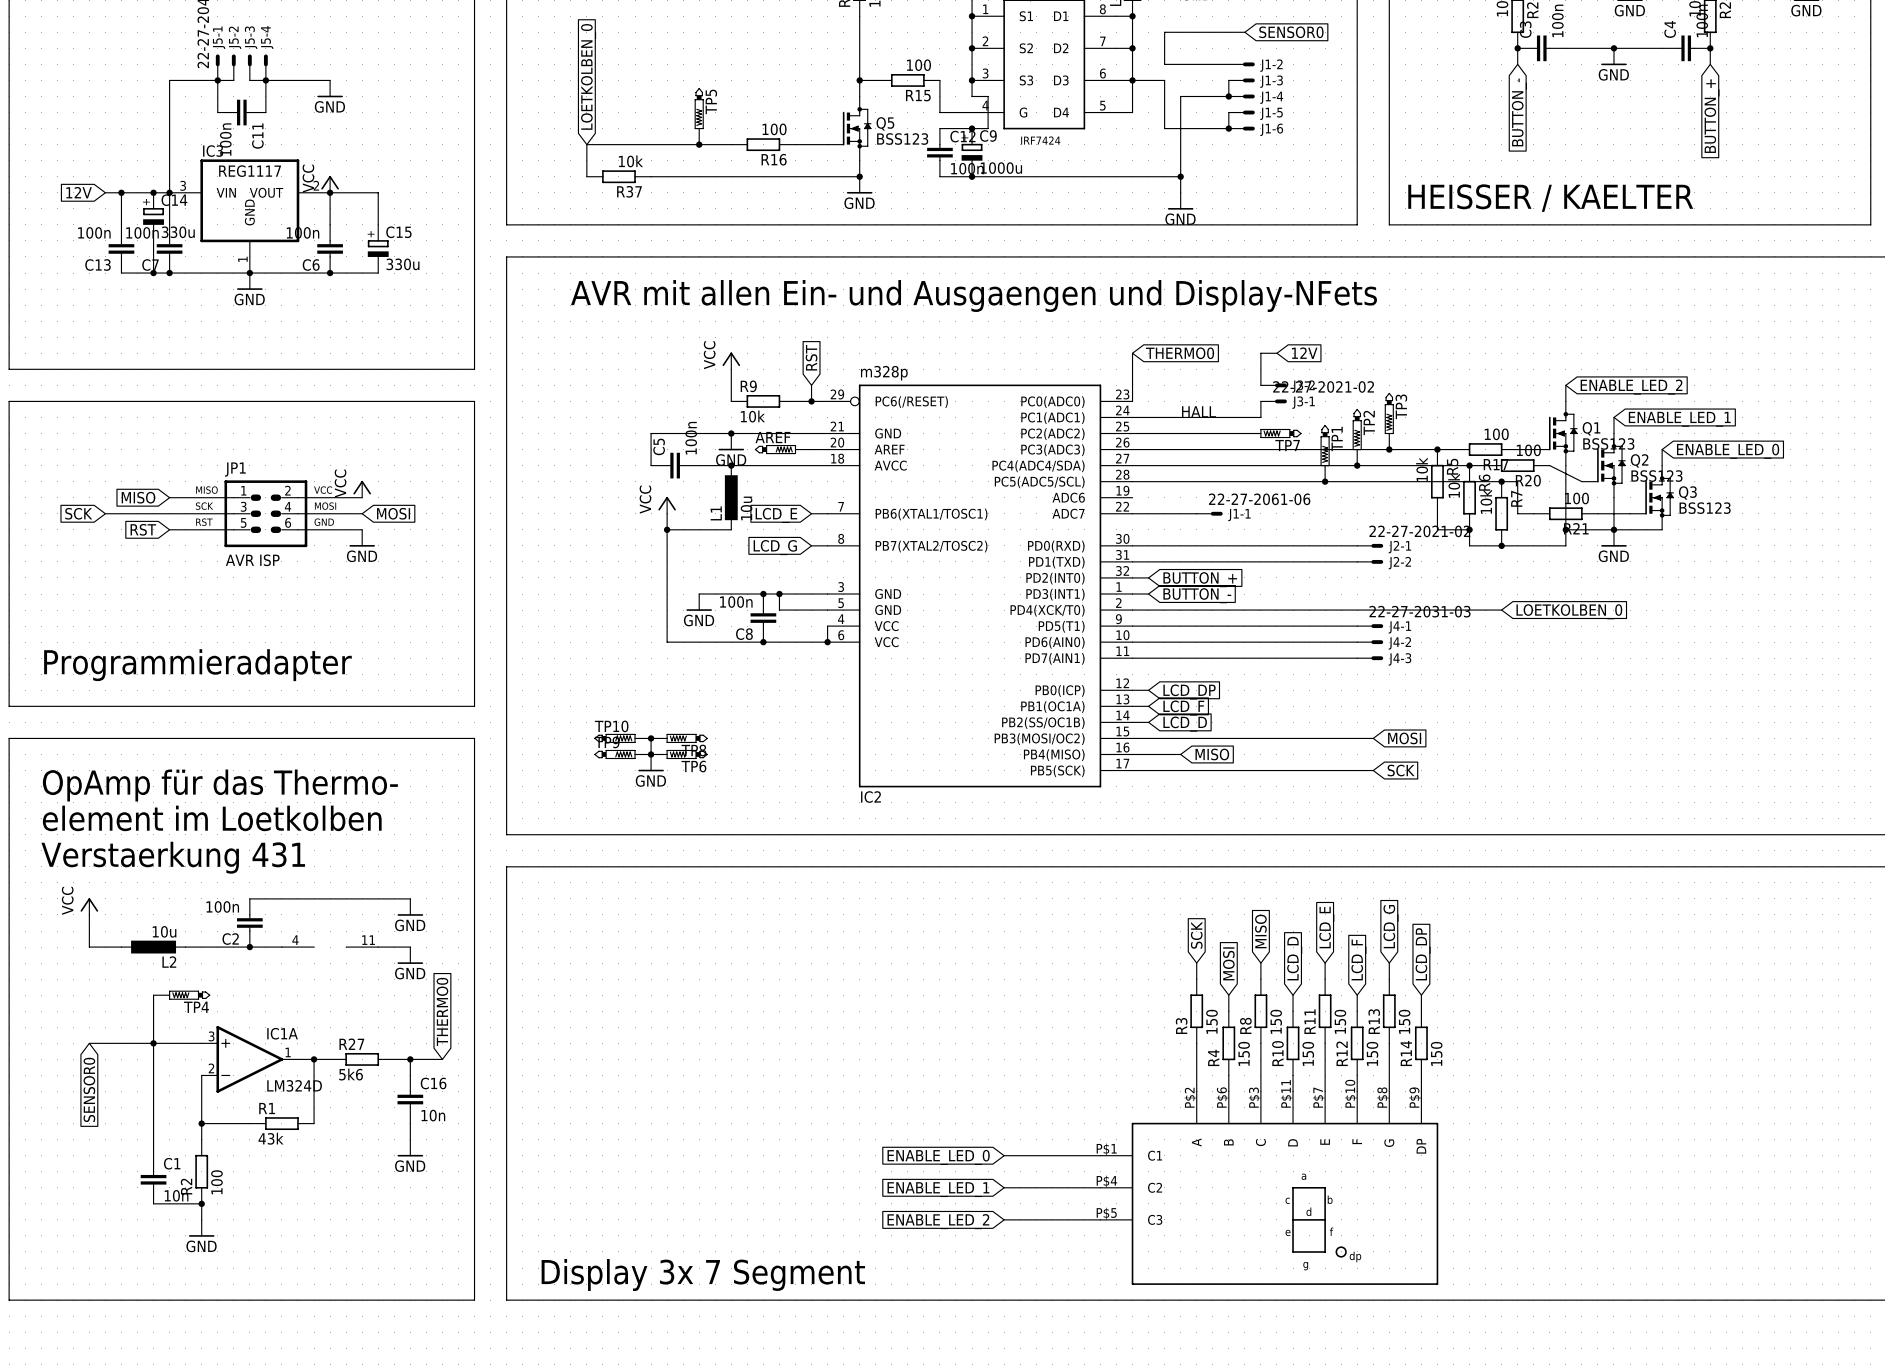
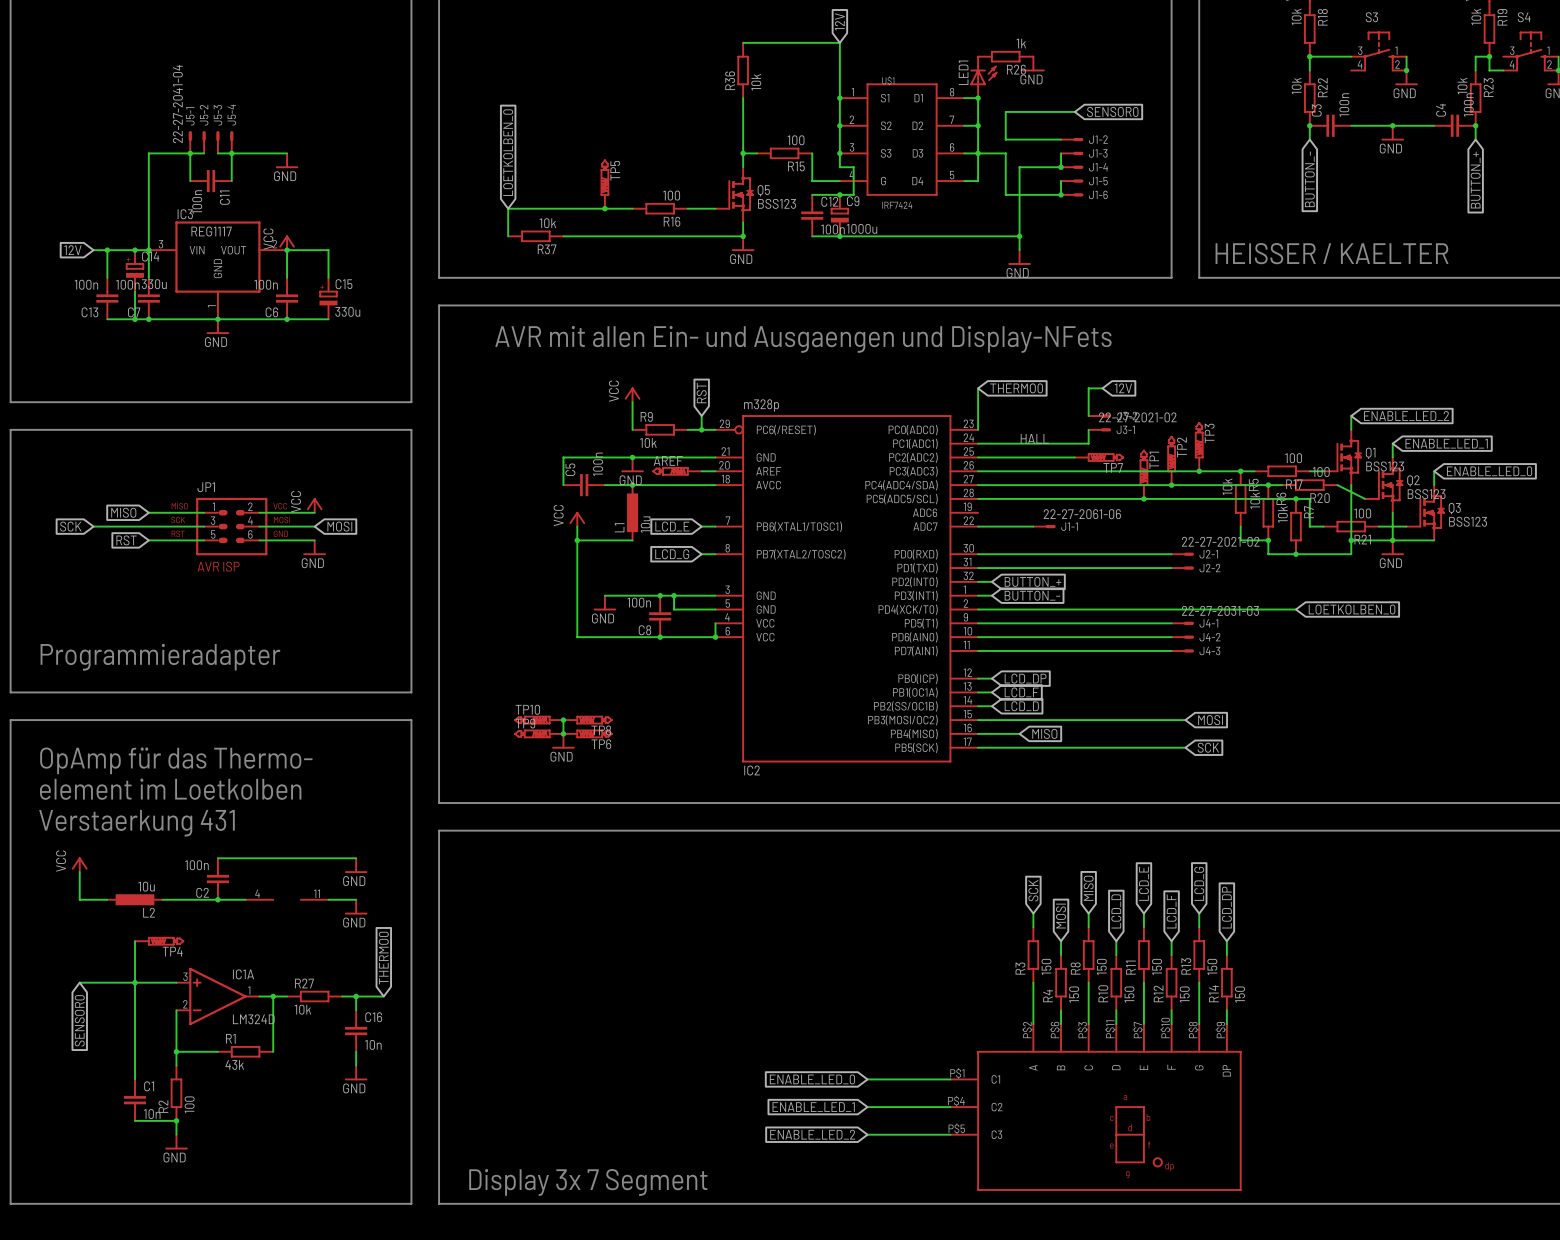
R27 value: 5k6 (351, 1074) -> 10k (302, 1009)

